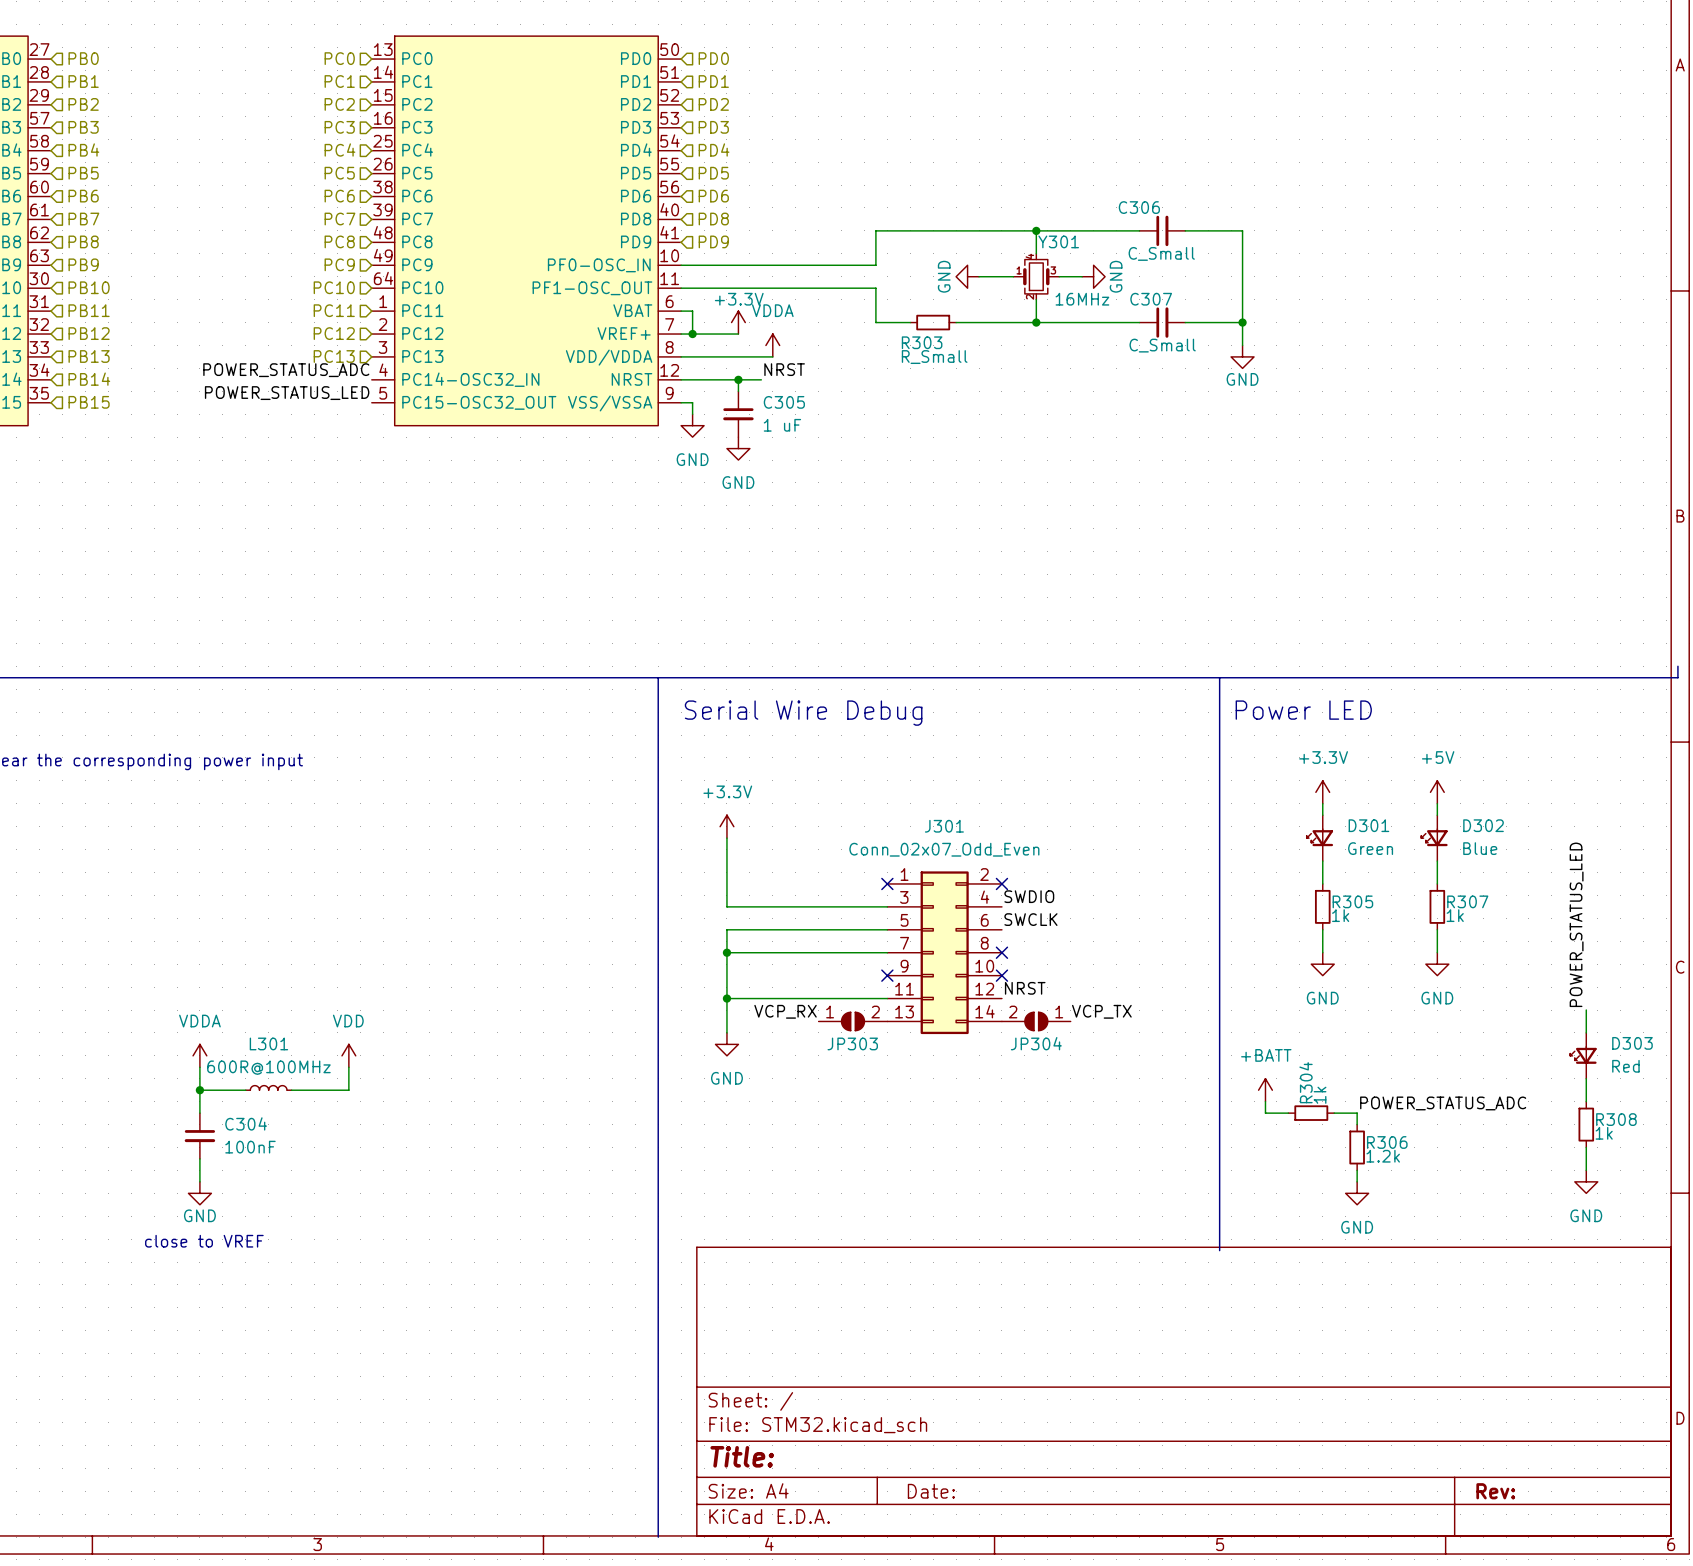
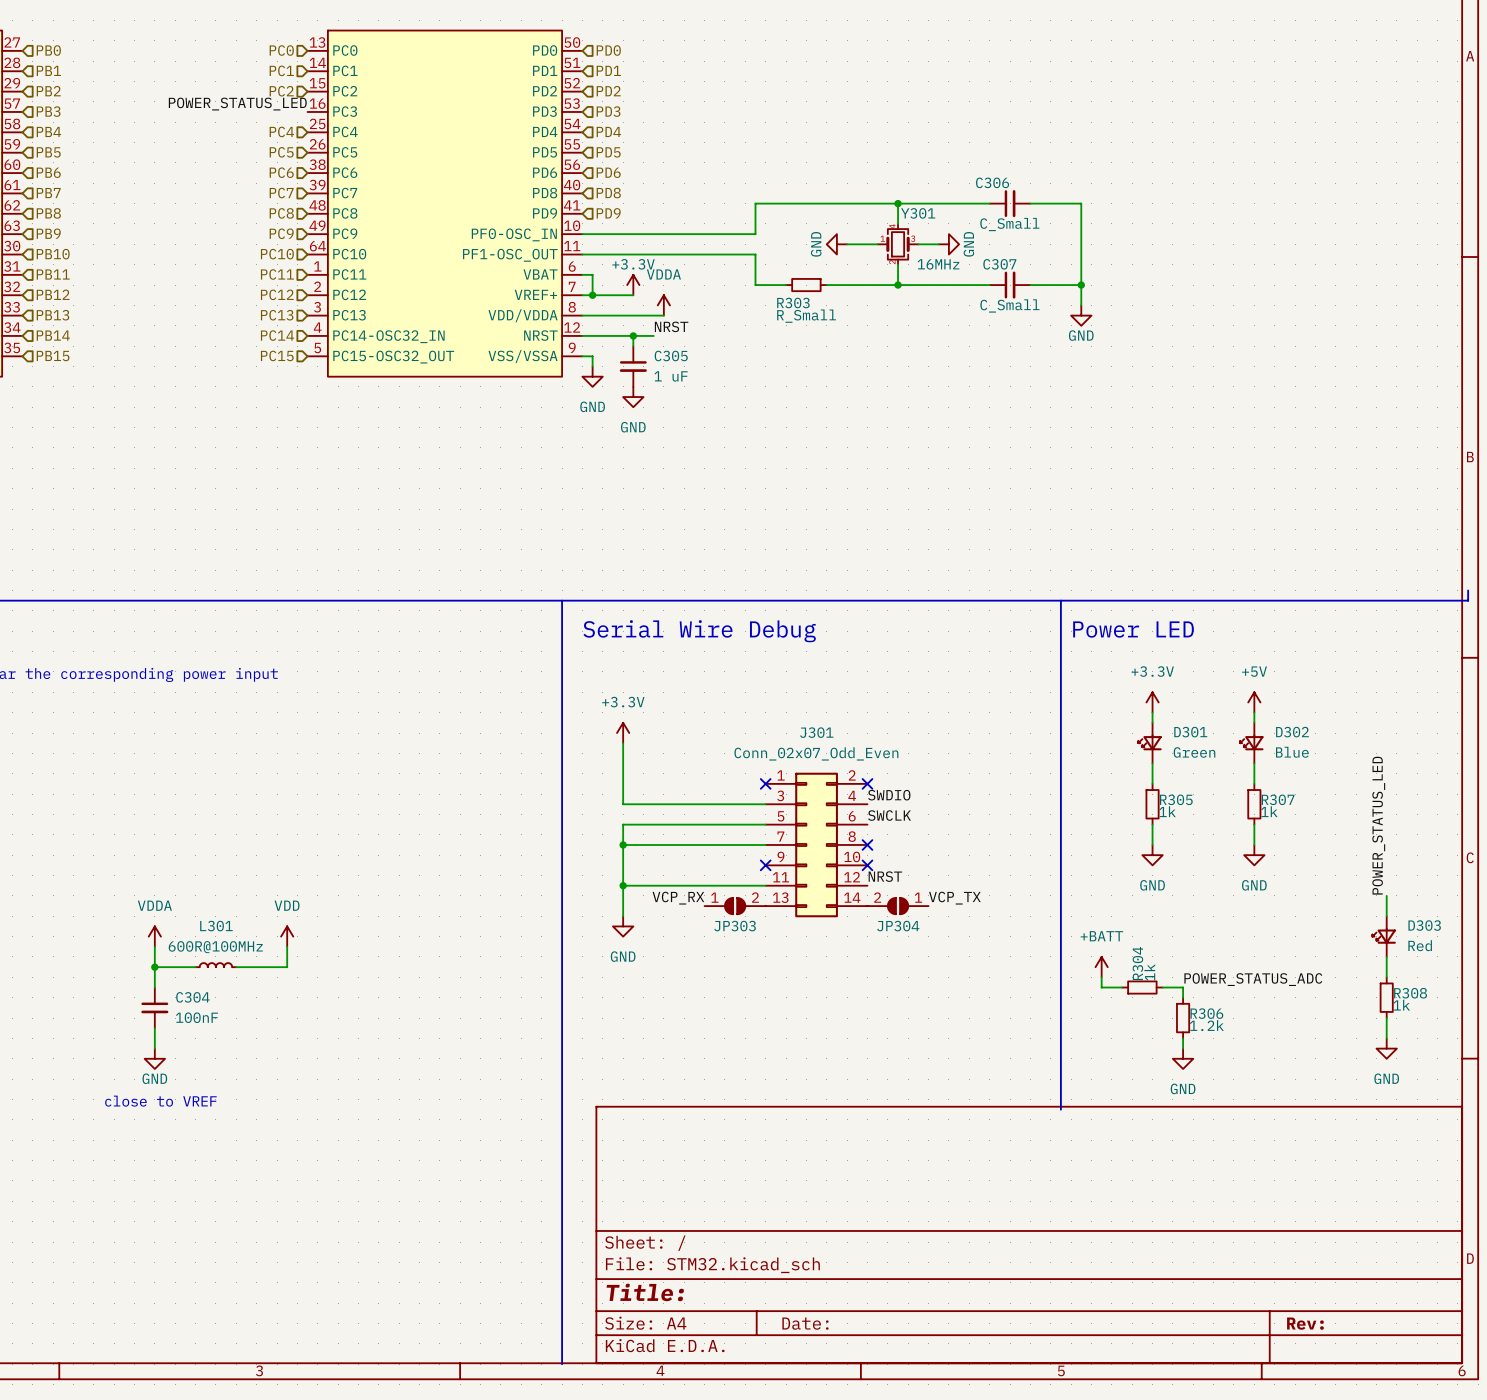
label: none -> POWER_STATUS_LED (237, 104)
hierarchical label: PC3 (339, 127) -> none
label: POWER_STATUS_ADC (286, 370) -> none
hierarchical label: none -> PC14 (277, 335)
label: POWER_STATUS_LED (287, 393) -> none
hierarchical label: none -> PC15 (277, 355)

